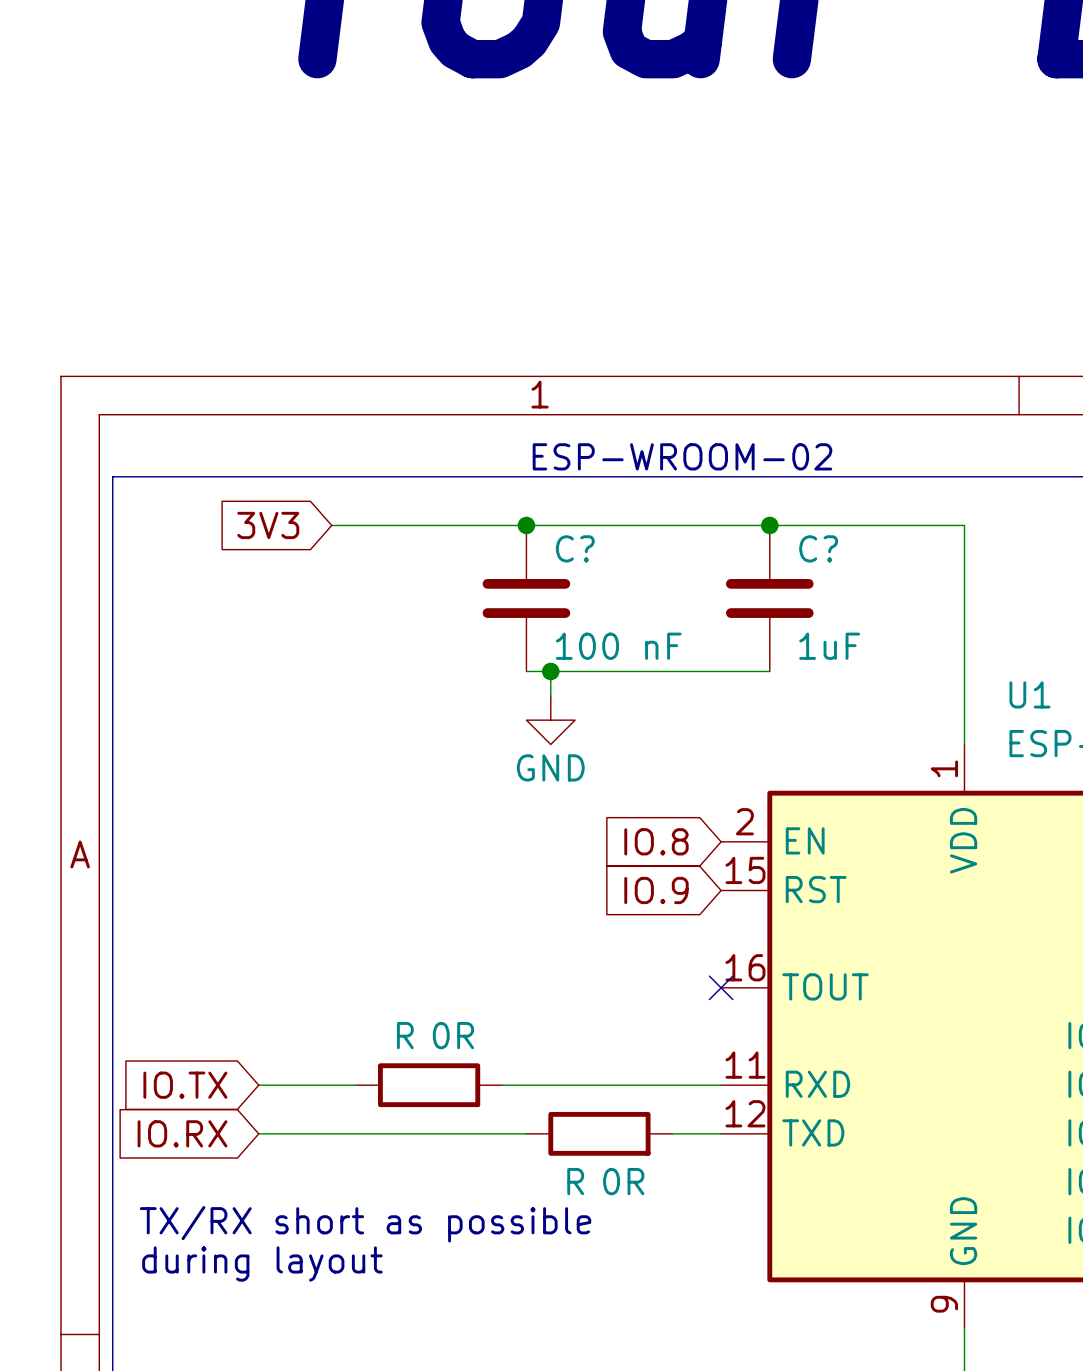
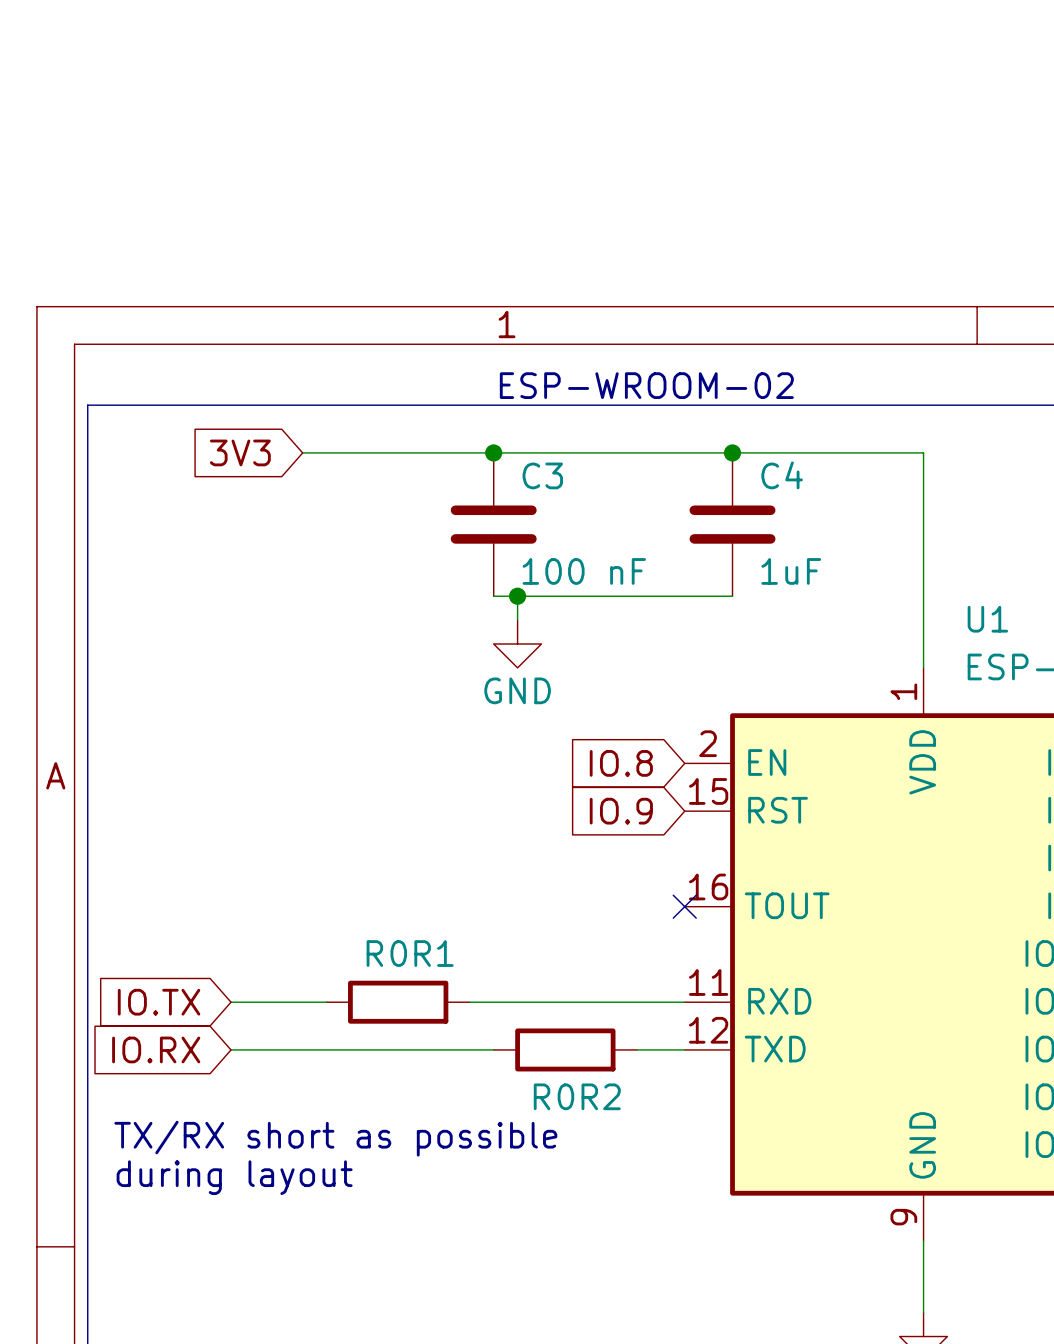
C? name: C? (575, 548) -> C3 (542, 475)
C? name: C? (818, 548) -> C4 (782, 475)
0R name: 0R (453, 1035) -> 0R1 (422, 953)
0R name: 0R (623, 1181) -> 0R2 (589, 1096)

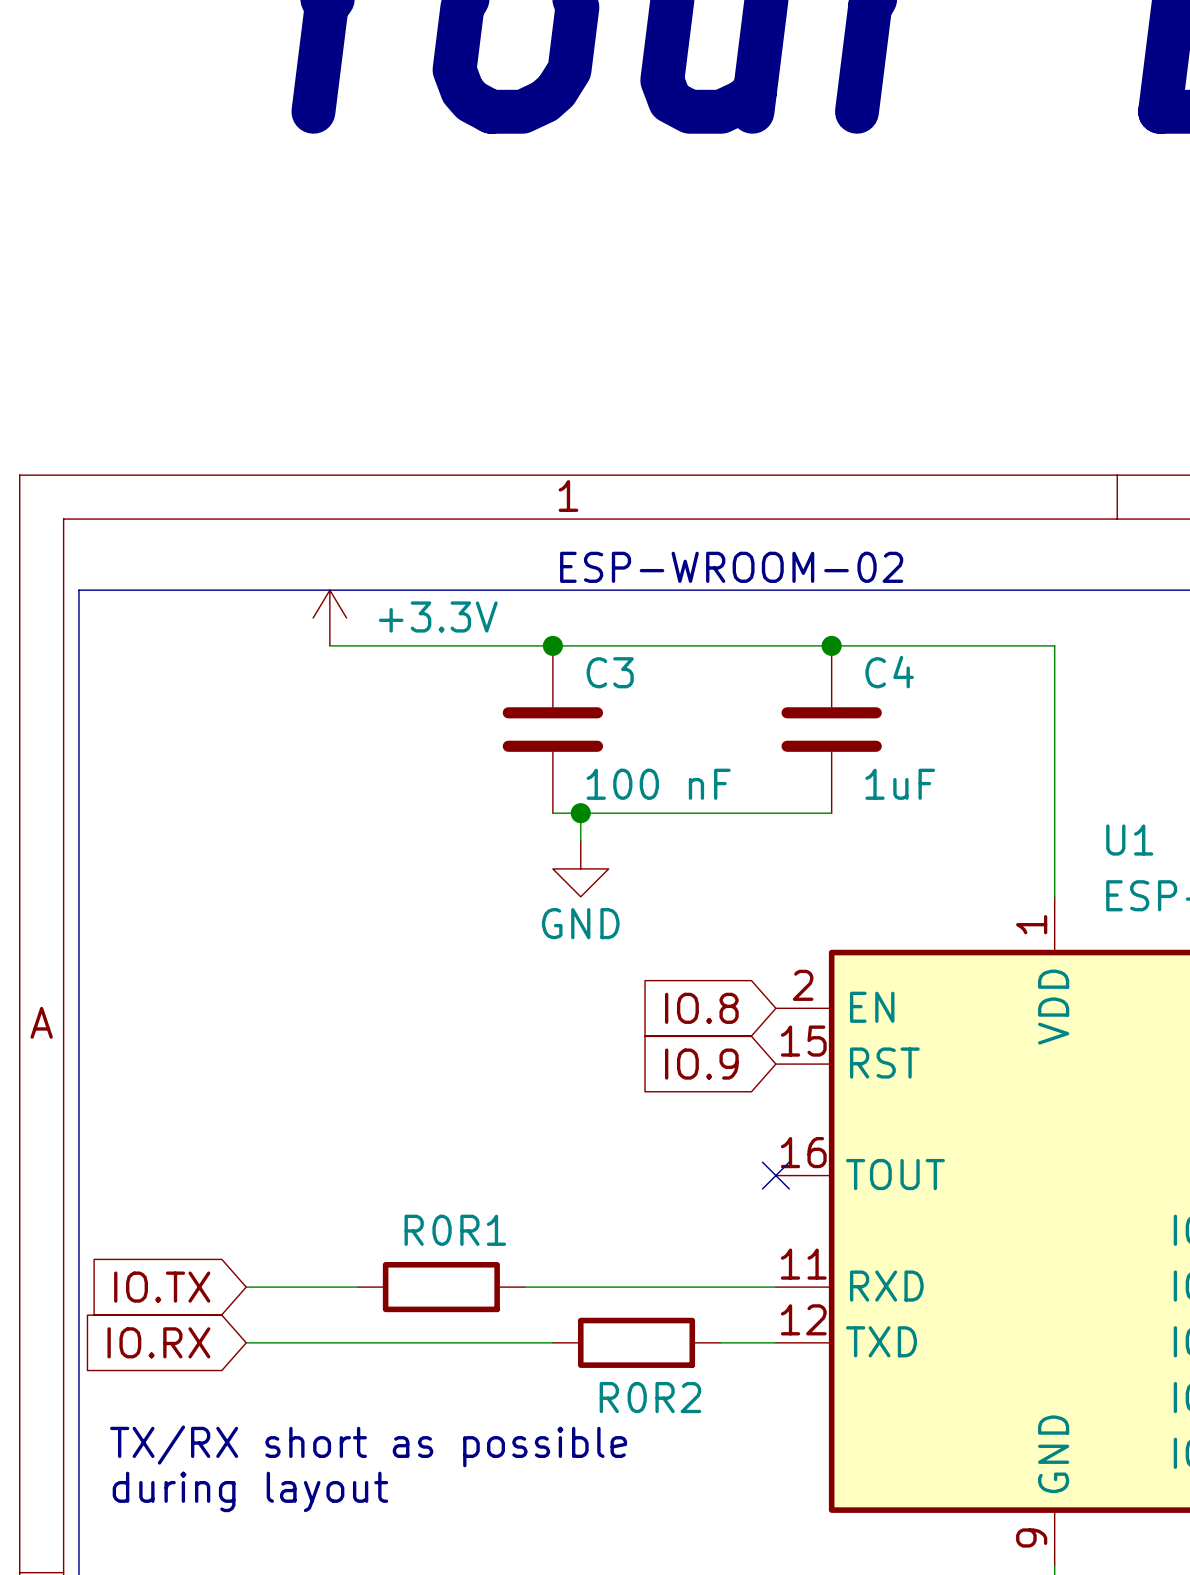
power symbol: none -> +3.3V (329, 618)
global label: 3V3 (240, 452) -> none

